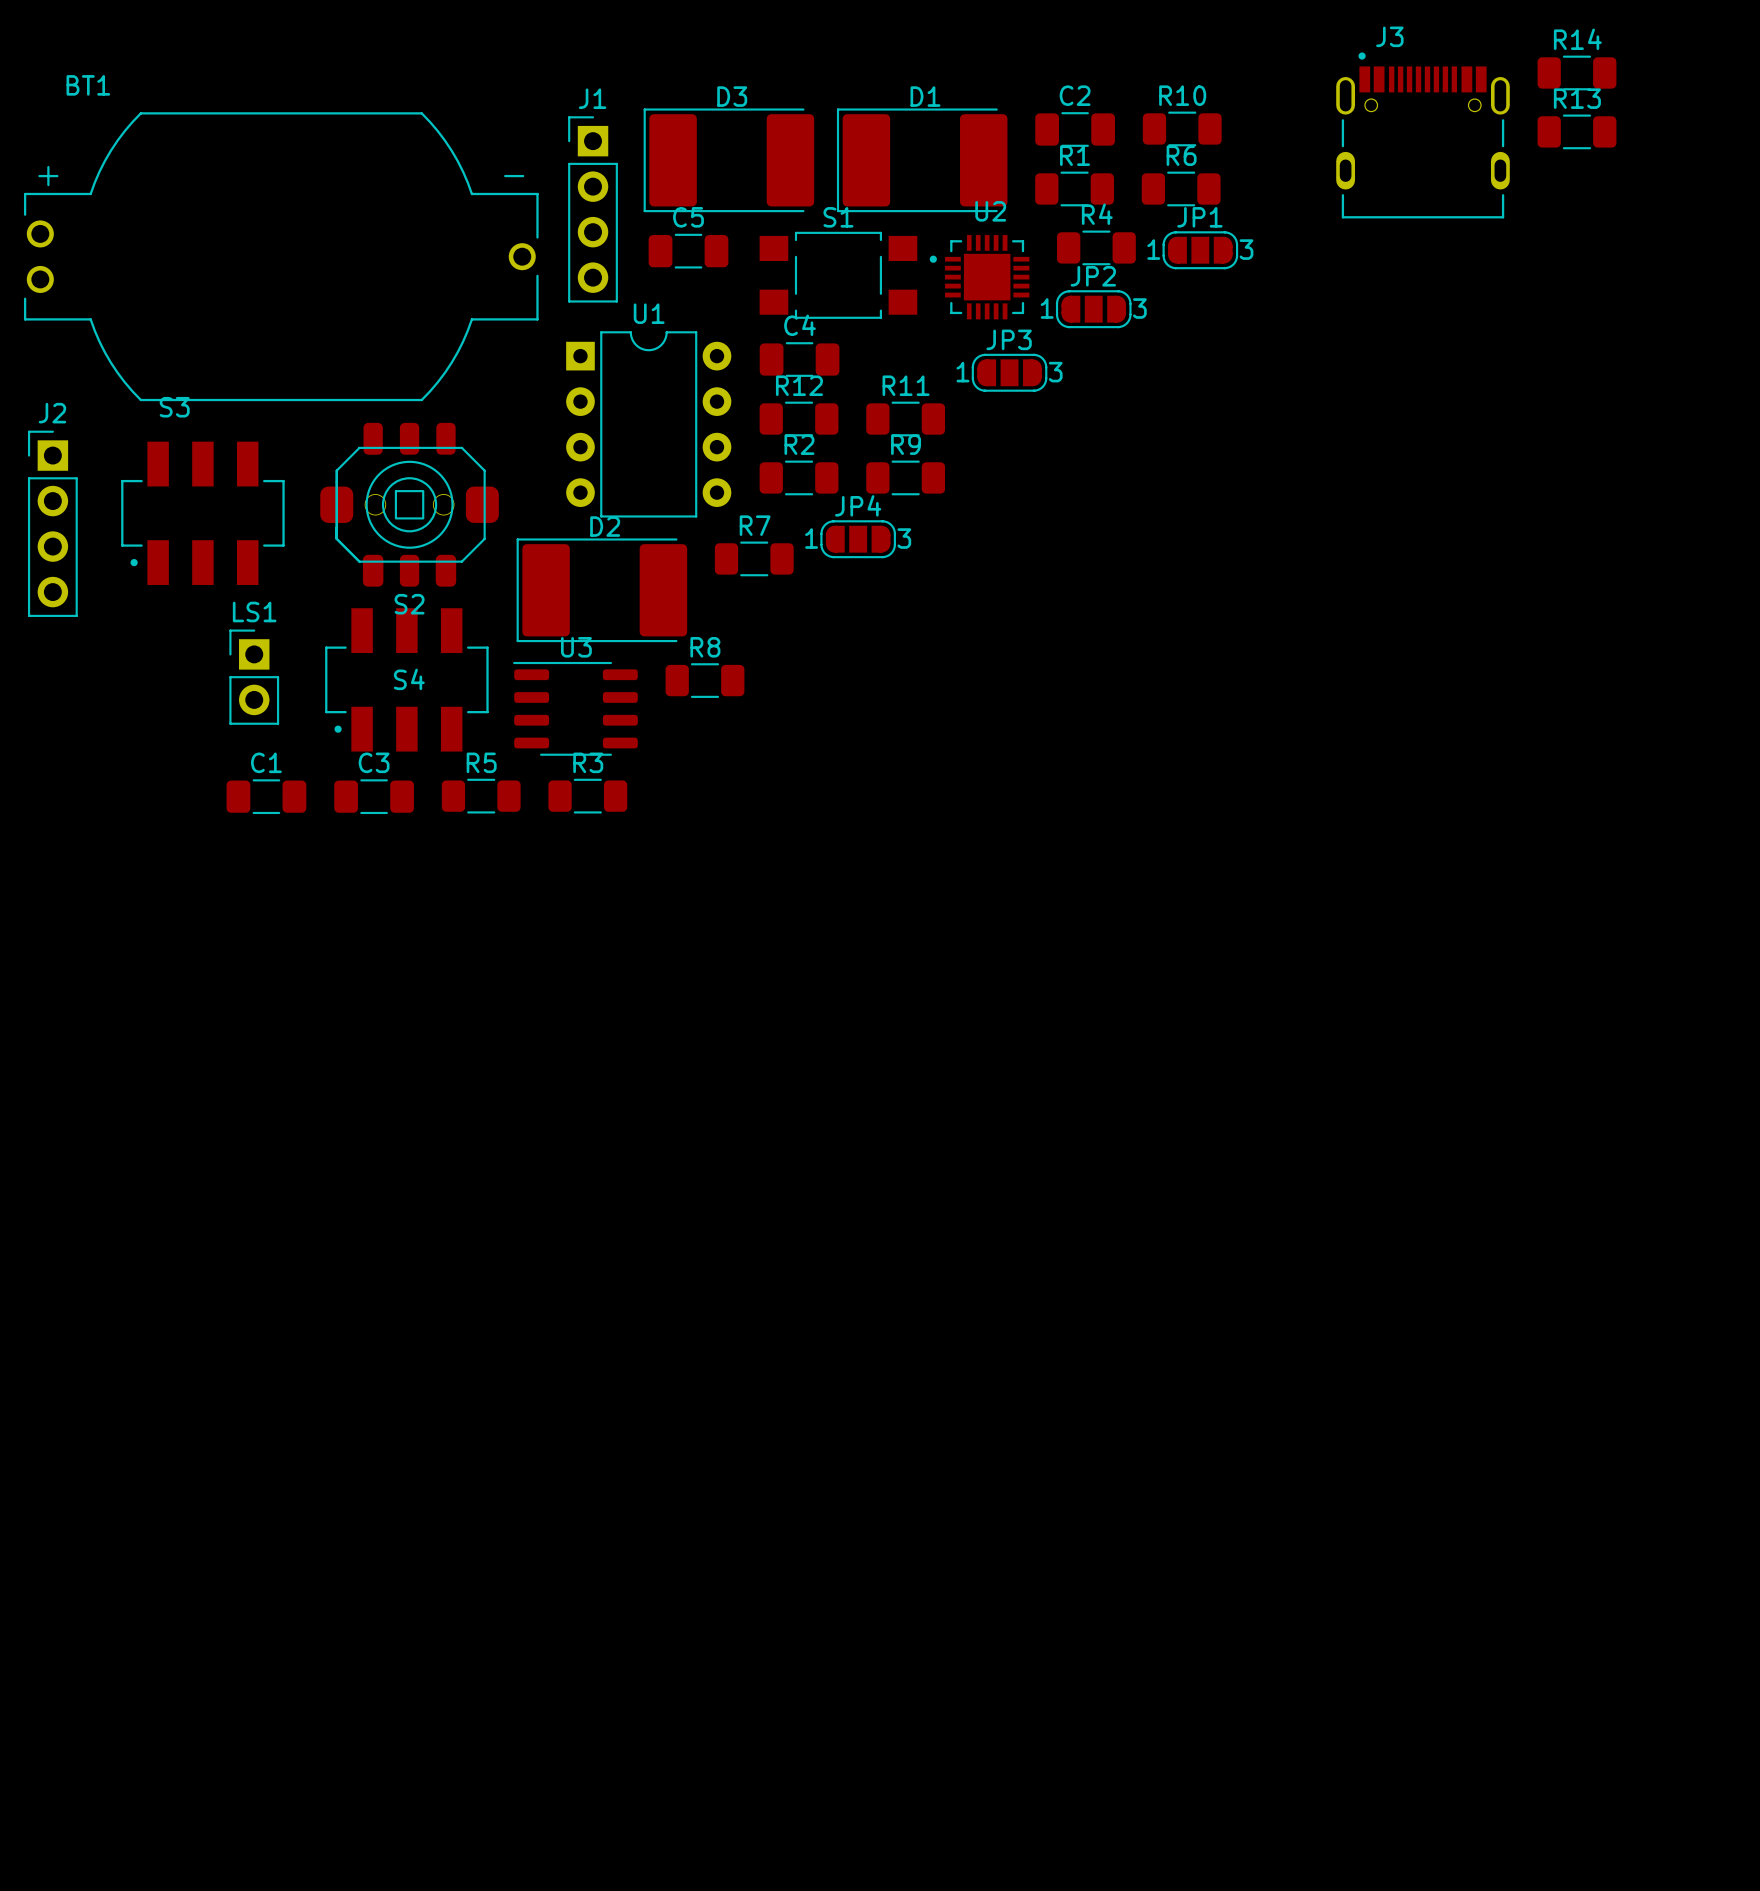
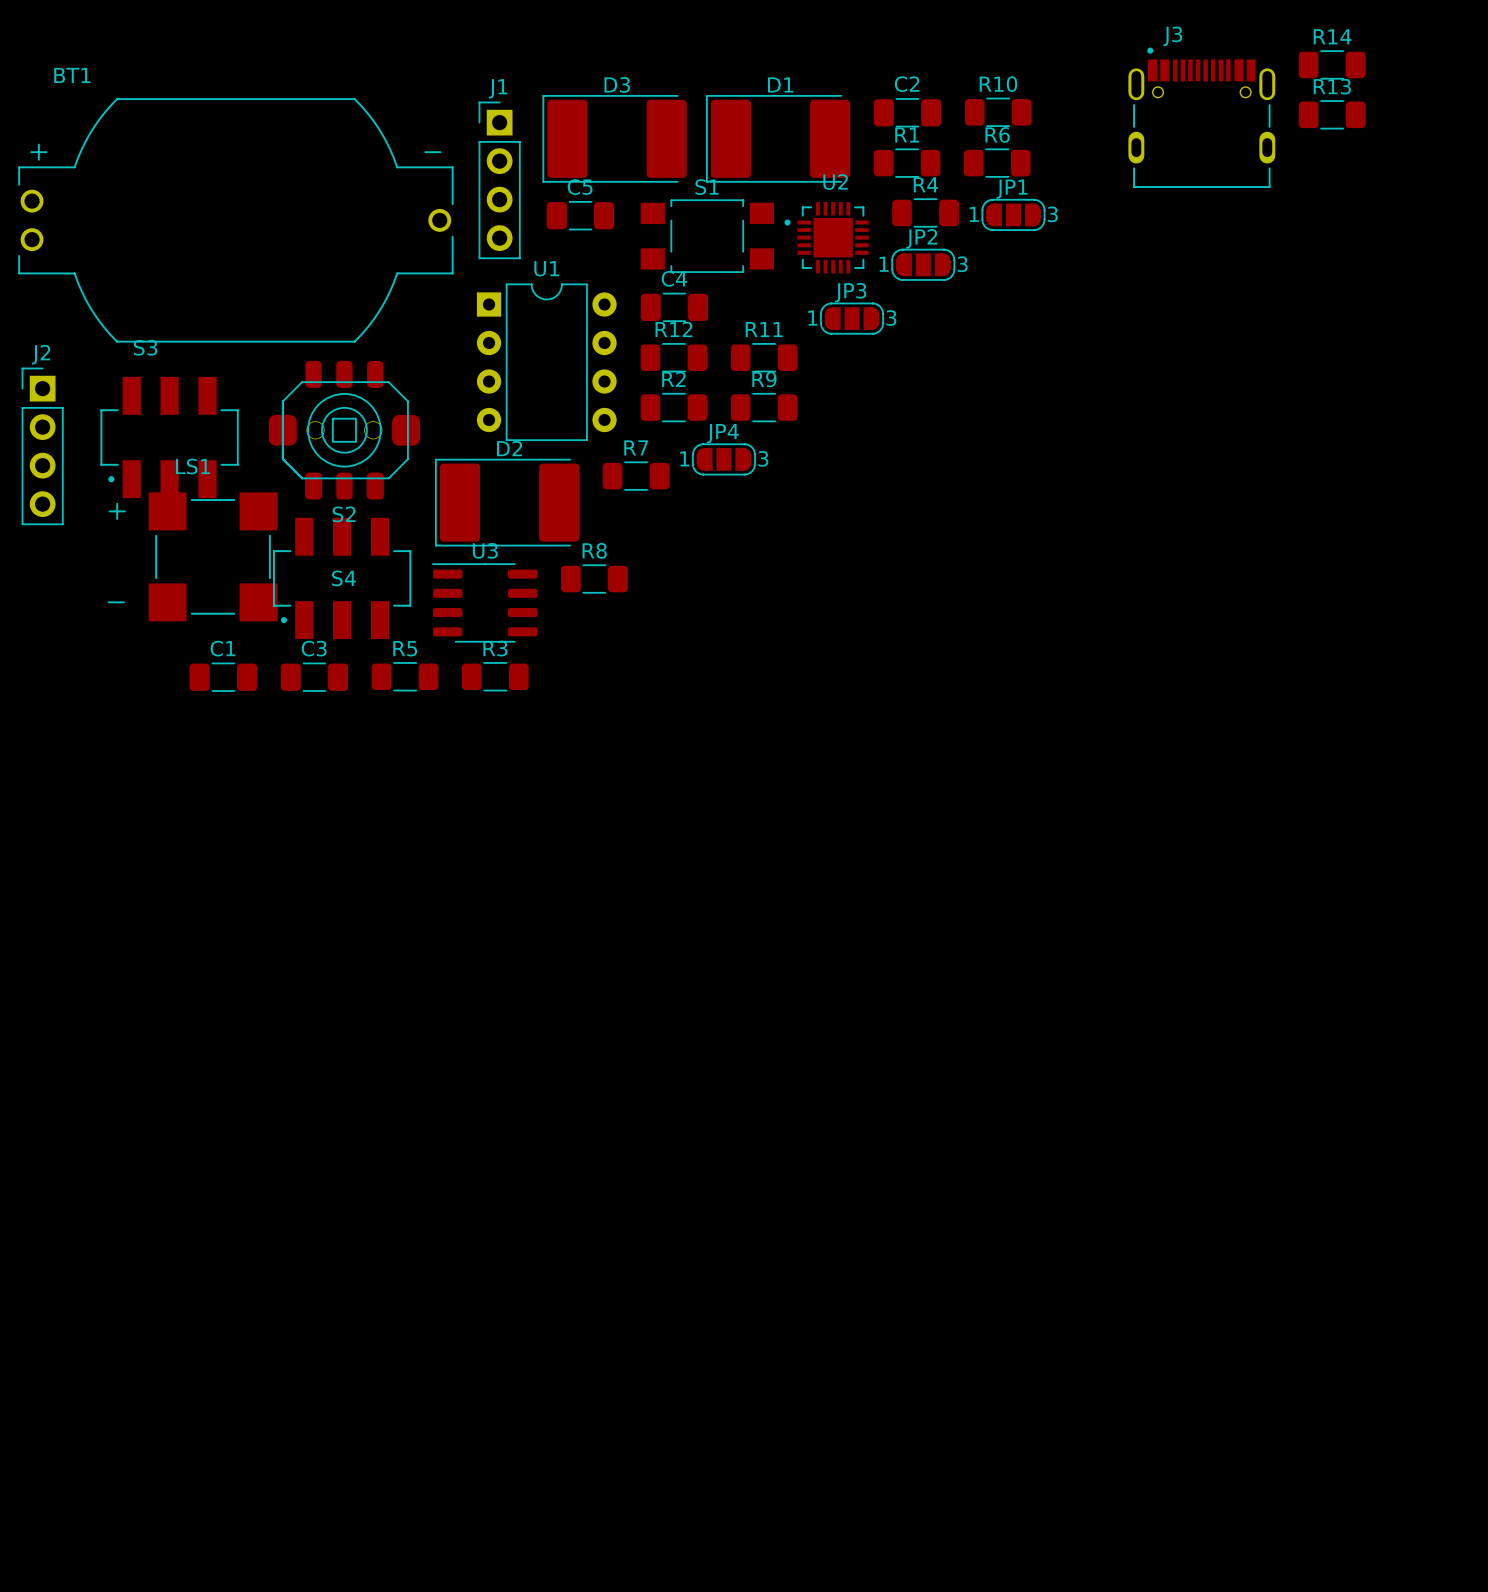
LS1 name position: LS1 (254, 612) -> LS1 (192, 466)
LS1 footprint: [229, 629, 280, 725] -> [107, 492, 278, 622]

